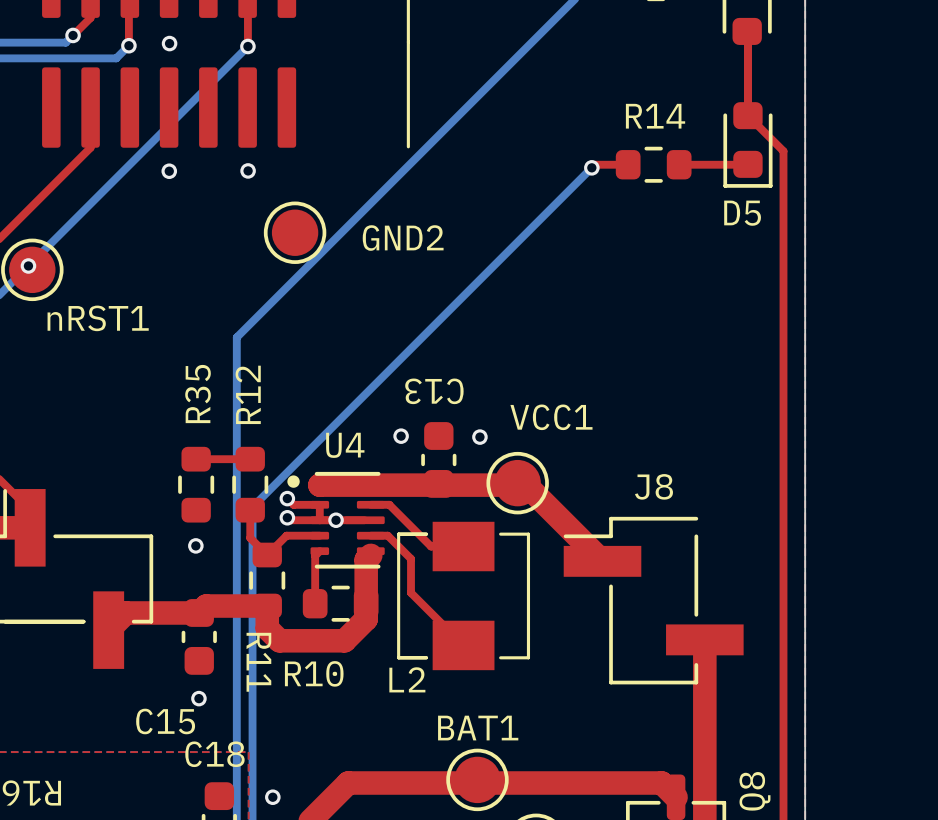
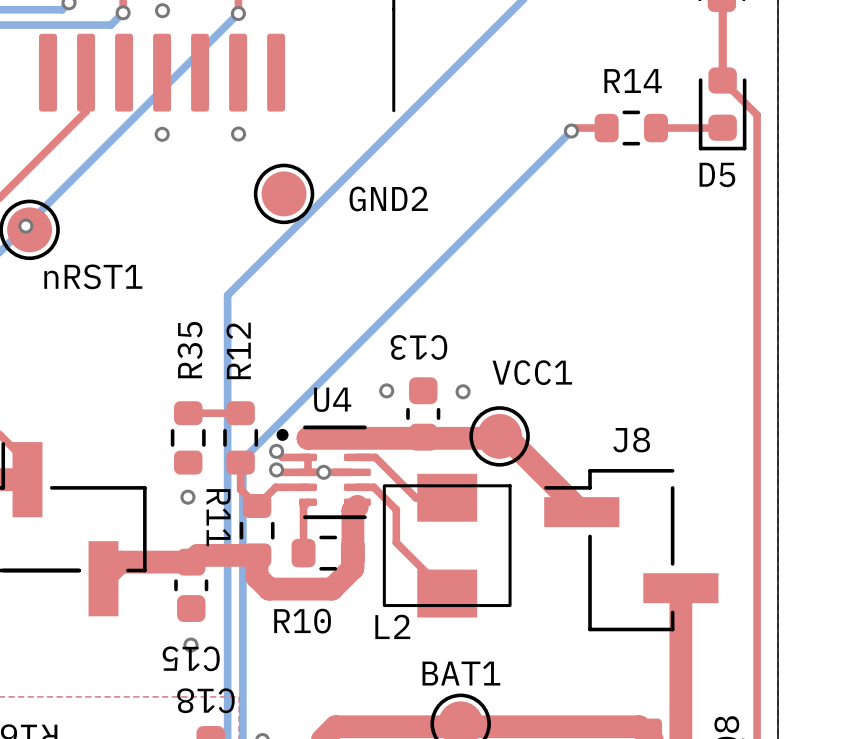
L2 footprint: [397, 521, 531, 671] -> [382, 473, 512, 618]
R11 name position: R11 (258, 662) -> R11 (218, 517)
C15 name rotation: 0° (165, 721) -> 180° (191, 658)
C18 name rotation: 0° (214, 754) -> 180° (205, 700)

